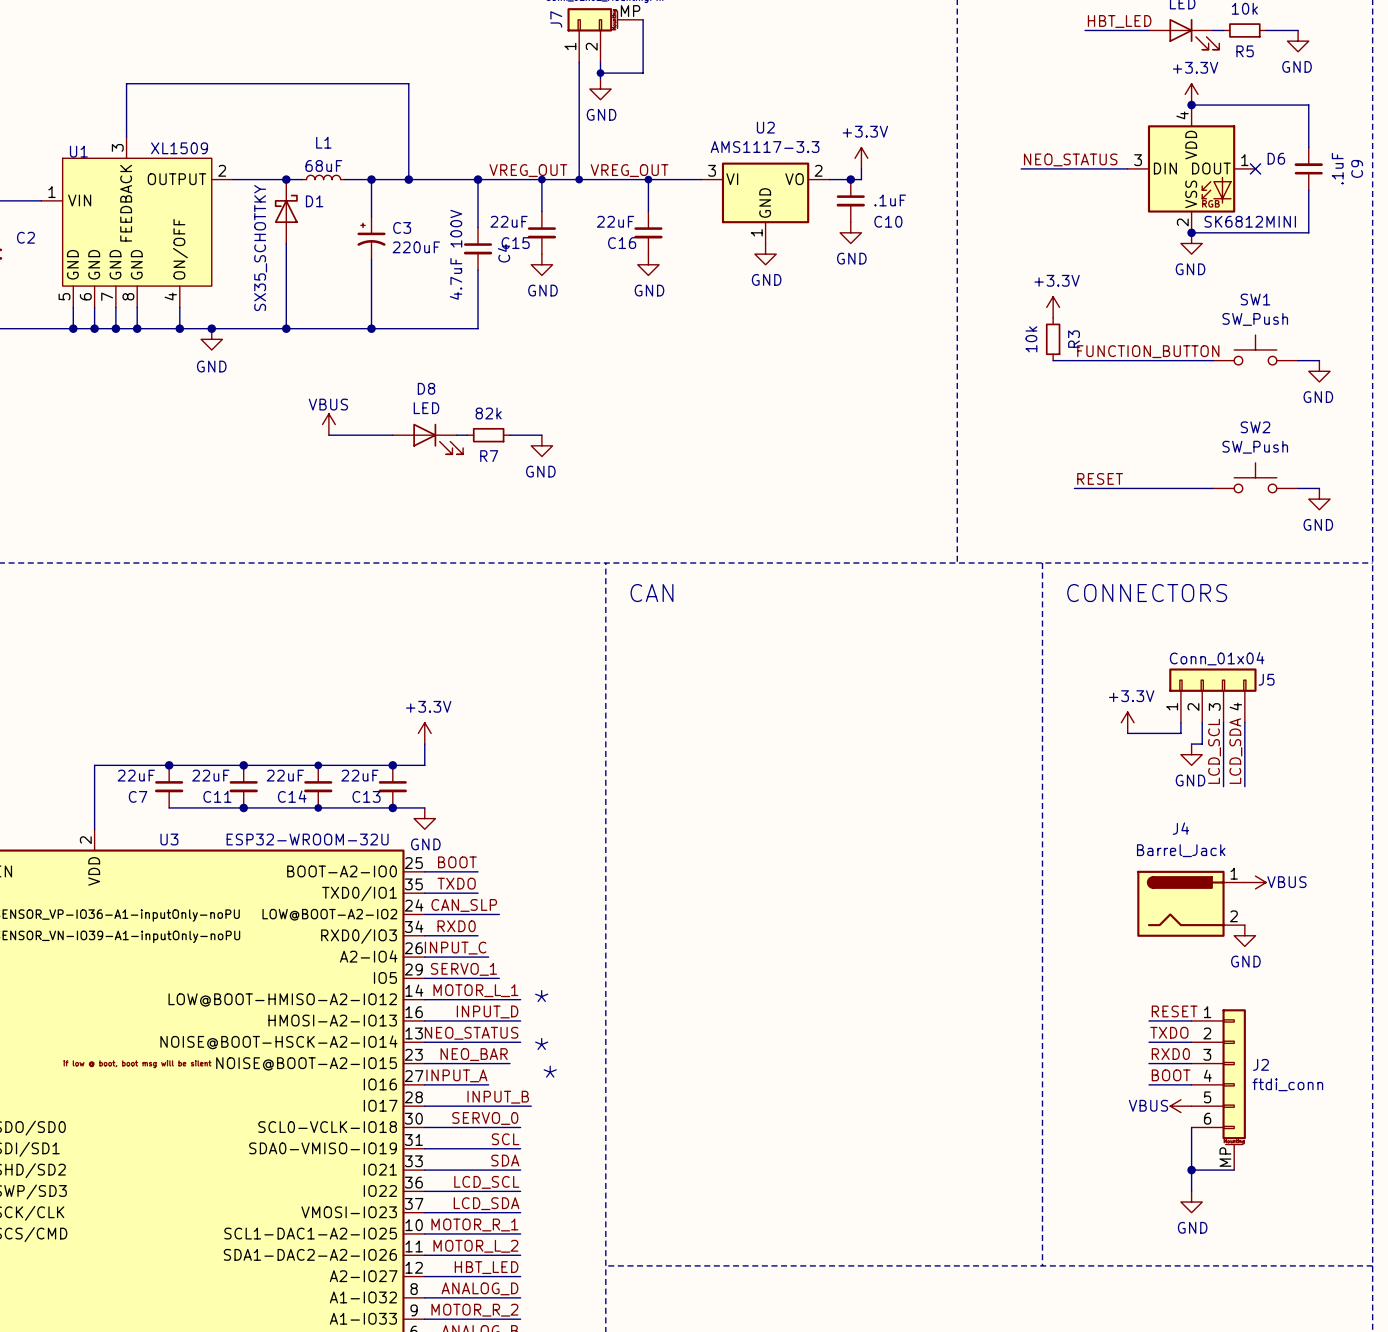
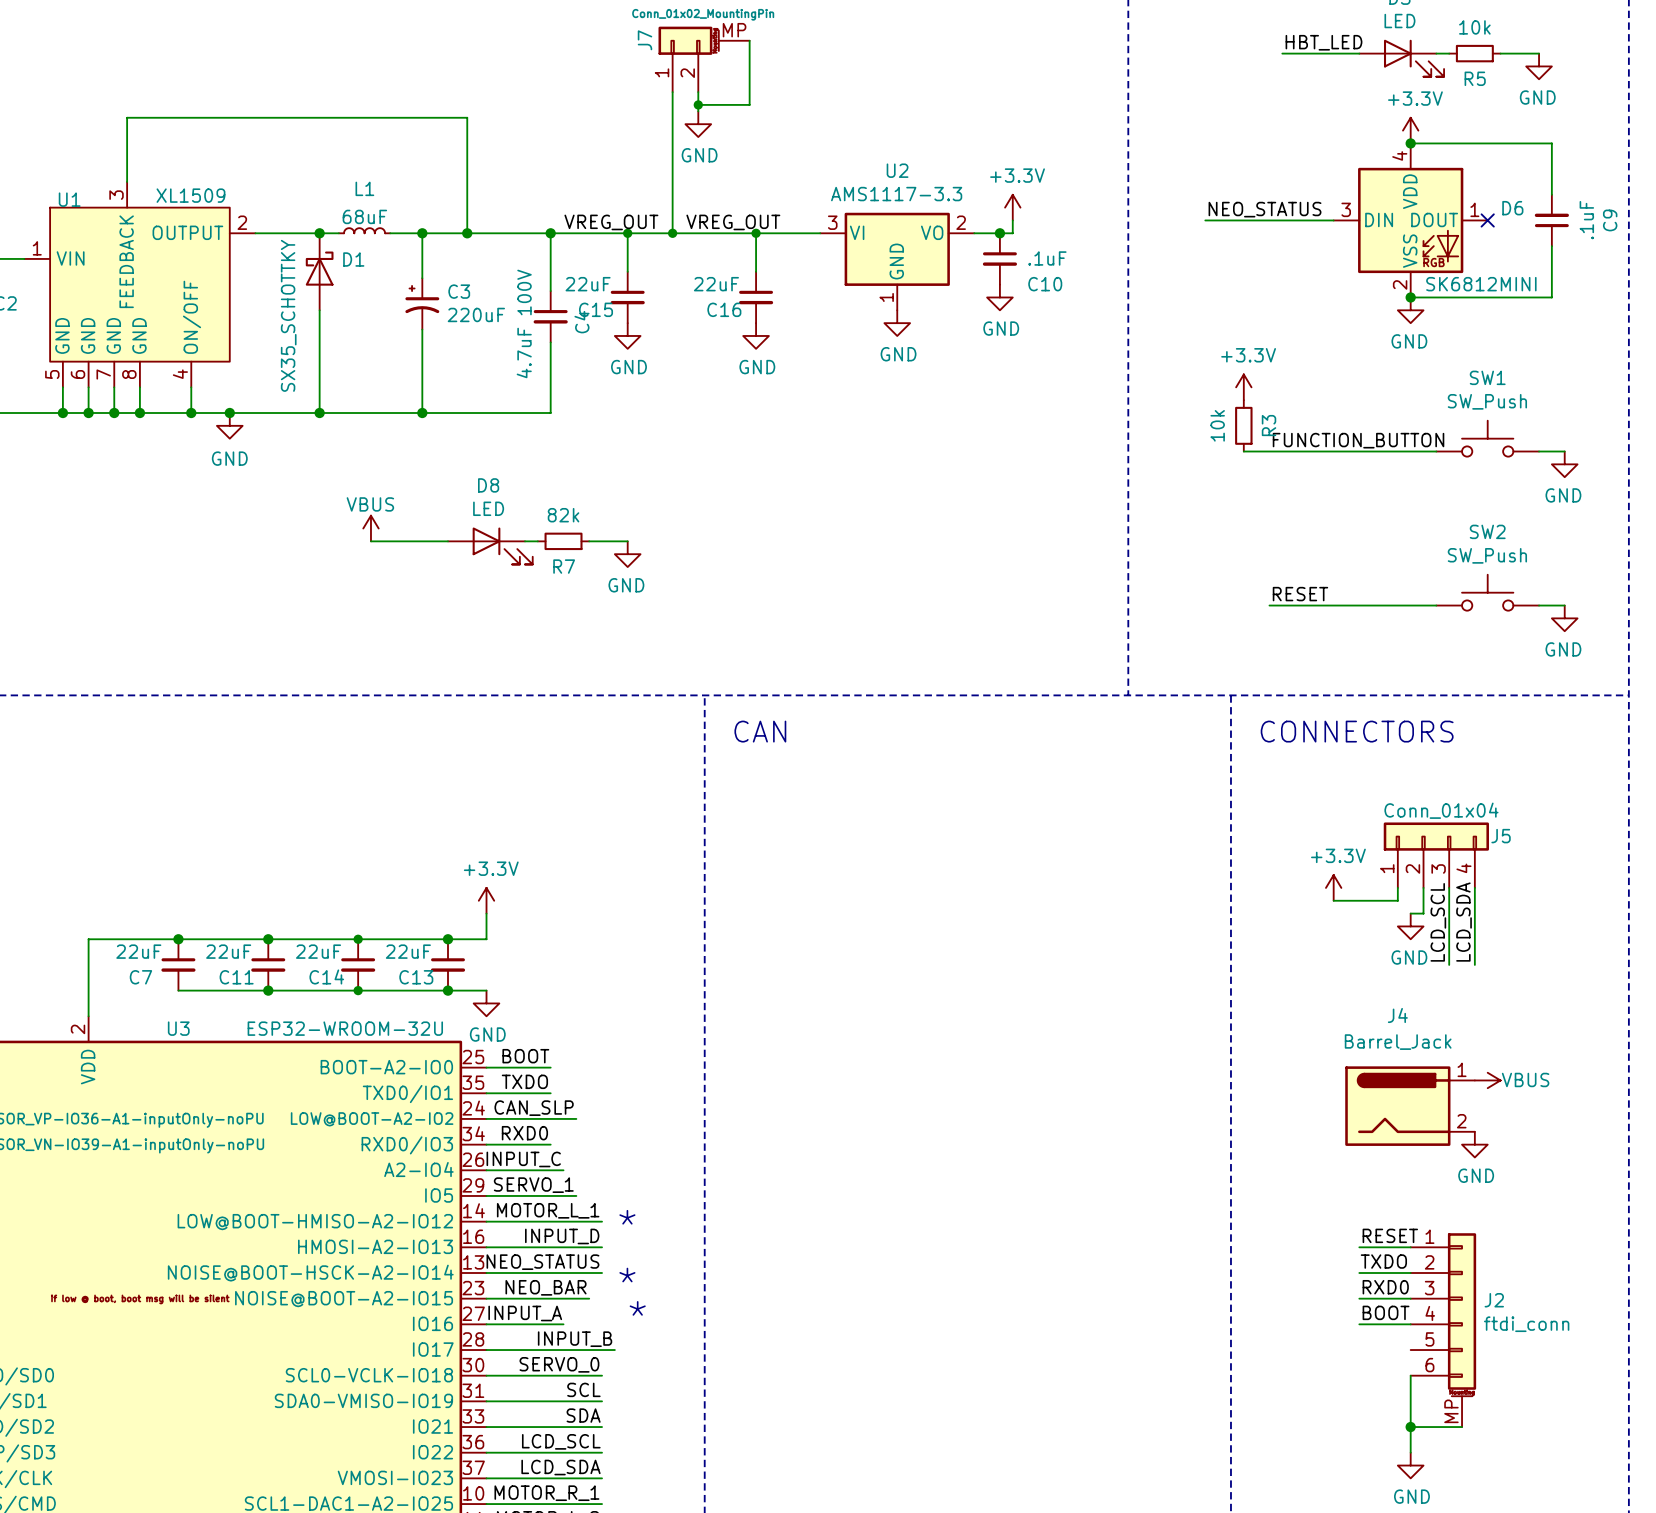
power symbol: VBUS (1180, 1106) -> none

